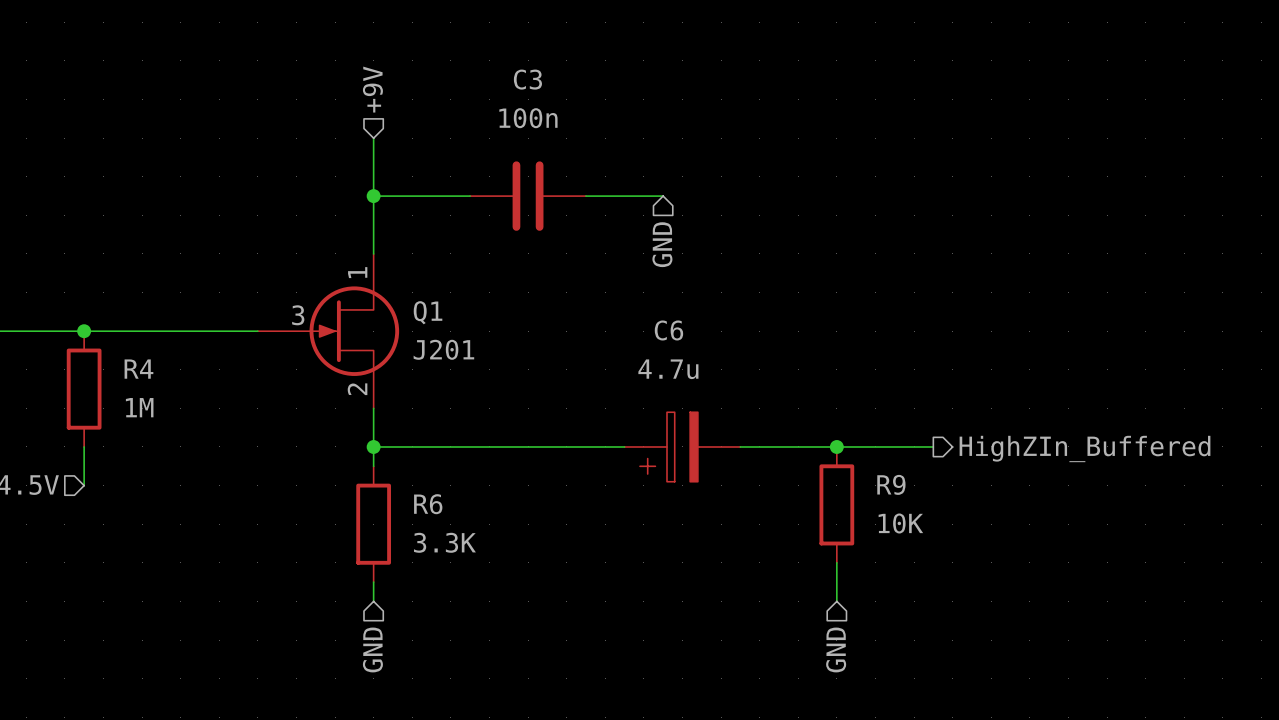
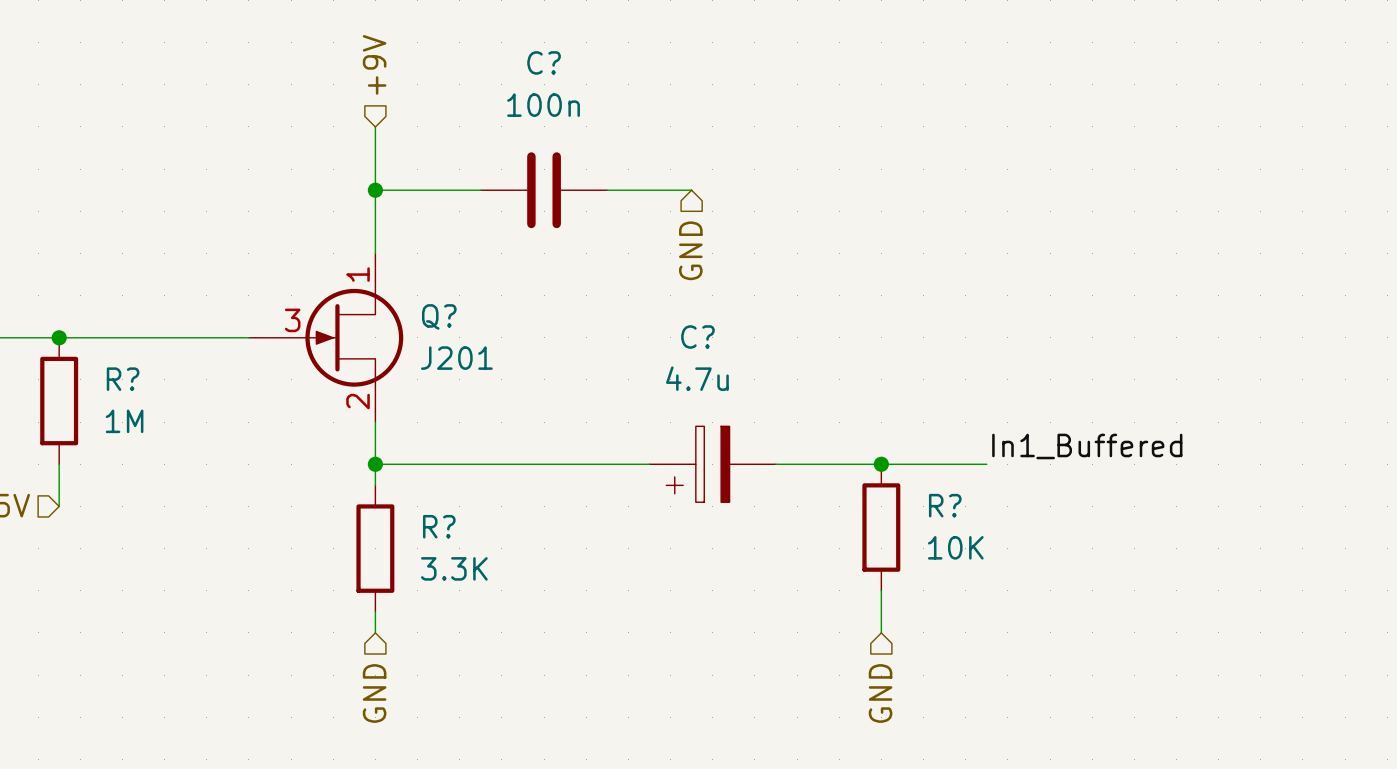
C3 name: C3 (527, 79) -> C? (544, 62)
Q1 name: Q1 (428, 312) -> Q? (439, 316)
C6 name: C6 (668, 330) -> C? (697, 337)
R4 name: R4 (138, 369) -> R? (123, 379)
label: none -> In1_Buffered (1087, 446)
hierarchical label: HighZIn_Buffered (1085, 448) -> none
R9 name: R9 (891, 484) -> R? (945, 505)
R6 name: R6 (428, 504) -> R? (439, 526)

